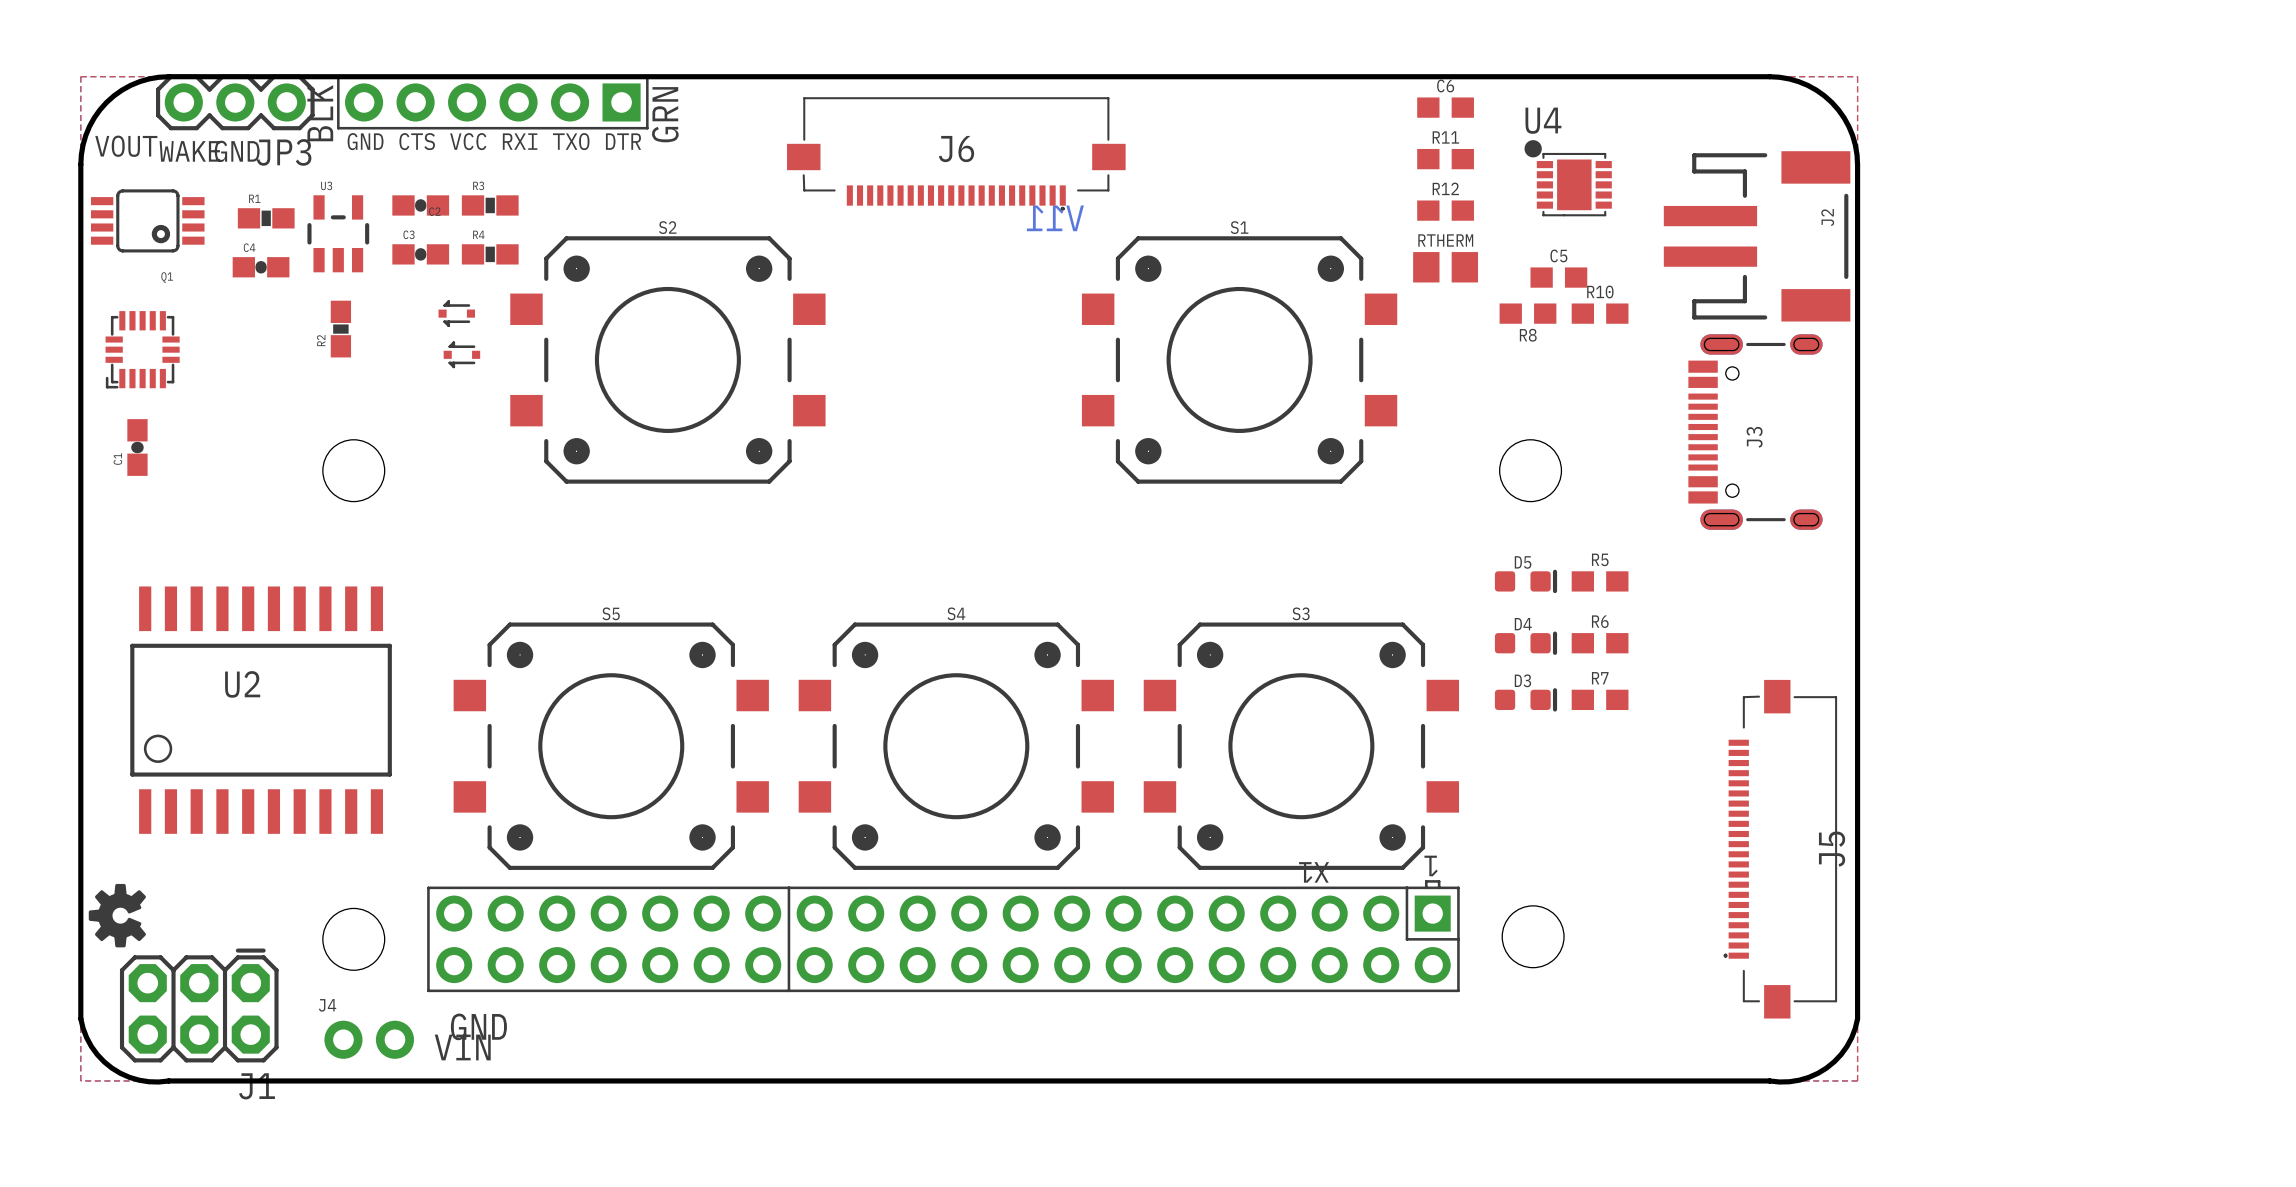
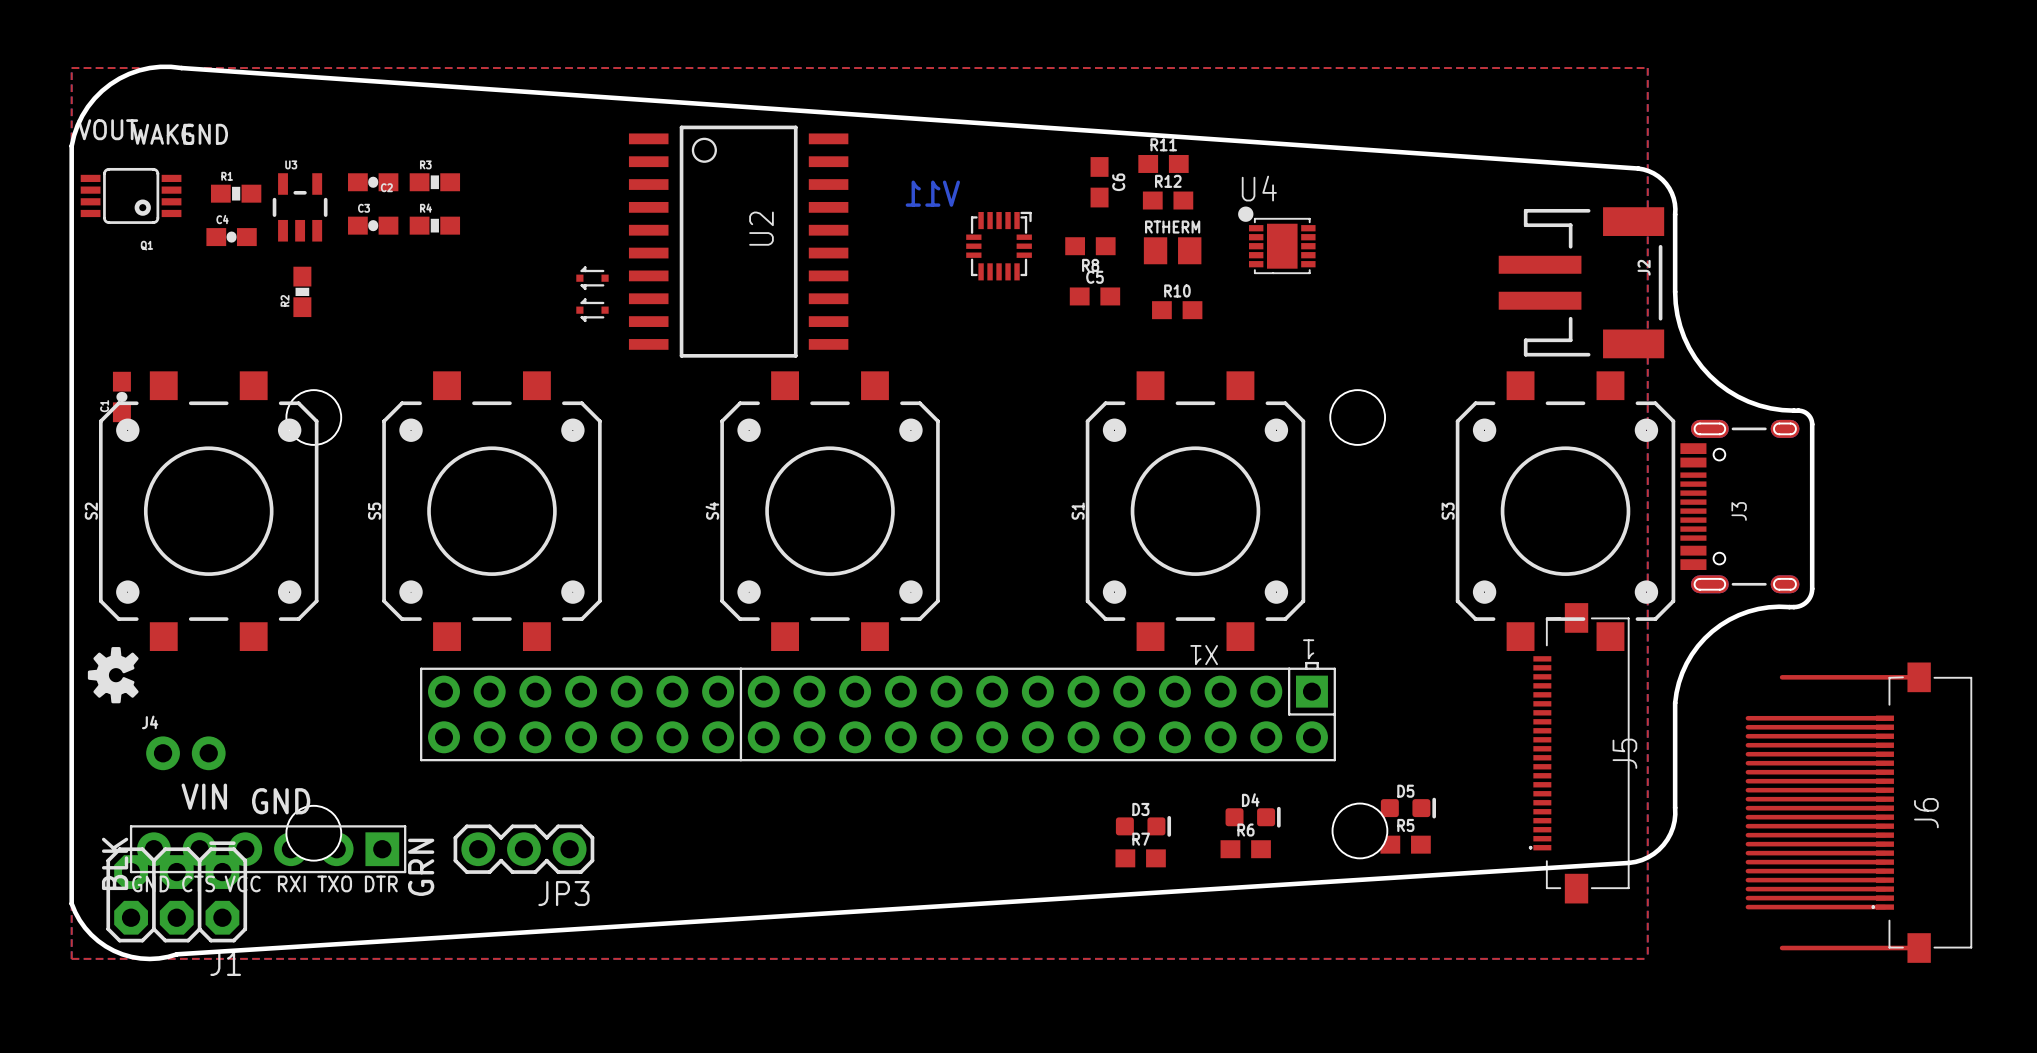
JP3 position: (235, 102) -> (523, 849)
part: (492, 102) -> none
C6 rotation: 0° (1445, 107) -> 90° clockwise (1099, 182)
C6 position: (1445, 107) -> (1099, 182)
J6 rotation: 0° (956, 153) -> 90° clockwise (1921, 812)
J6 position: (956, 153) -> (1921, 812)
R11 position: (1445, 159) -> (1163, 163)
board edge: (80, 164) (85, 135) (94, 117) (106, 102) (121, 90) (139, 81) (168, 76) (1769, 76) (1798, 81) (1816, 90) (1831, 102) (1844, 117) (1852, 135) (1857, 164) (1857, 1018) (1851, 1037) (1841, 1054) (1818, 1073) (1799, 1080) (1779, 1082) (148, 1081) (129, 1077) (104, 1061) (91, 1046) (80, 1018) -> (71, 146) (82, 115) (94, 98) (110, 84) (139, 70) (171, 66) (1638, 168) (1648, 171) (1662, 179) (1673, 198) (1675, 303) (1684, 337) (1695, 357) (1718, 383) (1737, 396) (1770, 408) (1803, 411) (1810, 417) (1812, 424) (1810, 595) (1806, 601) (1798, 606) (1758, 608) (1729, 619) (1704, 638) (1691, 654) (1682, 672) (1675, 703) (1675, 814) (1673, 827) (1667, 839) (1658, 849) (1648, 857) (1635, 861) (177, 954) (149, 958) (131, 956) (105, 946) (85, 927) (71, 903)
U4 position: (1568, 178) -> (1276, 240)
R12 position: (1445, 210) -> (1168, 200)
S2 name position: S2 (667, 227) -> S2 (91, 511)
S1 name position: S1 (1239, 227) -> S1 (1078, 511)
J2 position: (1757, 236) -> (1581, 282)
RTHERM position: (1445, 267) -> (1172, 250)
part: none -> (999, 246)
C5 position: (1558, 277) -> (1094, 296)
part: (456, 313) -> none
part: none -> (592, 278)
R8 position: (1527, 313) -> (1090, 246)
R10 position: (1600, 313) -> (1177, 310)
part: (142, 349) -> none
part: none -> (592, 310)
part: (461, 354) -> none
S2 rotation: 0° (667, 359) -> 90° clockwise (208, 511)
S2 position: (667, 359) -> (208, 511)
S1 rotation: 0° (1239, 359) -> 90° clockwise (1195, 511)
S1 position: (1239, 359) -> (1195, 511)
J3 position: (1755, 432) -> (1739, 506)
D5 position: (1525, 581) -> (1408, 808)
R5 position: (1600, 581) -> (1405, 844)
S5 name position: S5 (611, 613) -> S5 (374, 511)
S4 name position: S4 (956, 613) -> S4 (712, 510)
S3 name position: S3 (1301, 613) -> S3 (1448, 511)
D4 position: (1525, 643) -> (1253, 817)
R6 position: (1600, 643) -> (1245, 849)
D3 position: (1525, 699) -> (1143, 826)
R7 position: (1600, 699) -> (1140, 858)
U2 rotation: 0° (261, 710) -> 90° clockwise (738, 241)
U2 position: (261, 710) -> (738, 241)
S5 rotation: 0° (611, 746) -> 90° clockwise (491, 511)
S4 rotation: 0° (956, 746) -> 90° clockwise (830, 511)
S3 rotation: 0° (1301, 746) -> 90° clockwise (1565, 511)
S3 position: (1301, 746) -> (1565, 511)
top track: none -> (1782, 677) (1919, 677)
top track: none -> (1747, 718) (1884, 718)
top track: none -> (1747, 727) (1884, 727)
top track: none -> (1747, 736) (1884, 736)
top track: none -> (1747, 745) (1884, 745)
top track: none -> (1747, 754) (1884, 754)
top track: none -> (1747, 763) (1884, 763)
top track: none -> (1747, 772) (1884, 772)
top track: none -> (1747, 781) (1884, 781)
top track: none -> (1747, 790) (1884, 790)
top track: none -> (1747, 799) (1884, 799)
top track: none -> (1747, 808) (1884, 808)
drawing position: (117, 915) -> (113, 675)
top track: none -> (1747, 817) (1884, 817)
top track: none -> (1747, 826) (1884, 826)
X1 position: (943, 936) -> (877, 711)
top track: none -> (1747, 835) (1884, 835)
top track: none -> (1747, 844) (1884, 844)
part: none -> (268, 849)
top track: none -> (1747, 853) (1884, 853)
top track: none -> (1747, 862) (1884, 862)
top track: none -> (1747, 871) (1884, 871)
top track: none -> (1747, 880) (1884, 880)
top track: none -> (1747, 889) (1884, 889)
top track: none -> (1747, 898) (1884, 898)
top track: none -> (1747, 907) (1884, 907)
text position: GND (478, 1026) -> GND (281, 801)
J4 position: (369, 1039) -> (185, 753)
text position: VIN (462, 1047) -> VIN (204, 796)
top track: none -> (1782, 948) (1919, 948)

